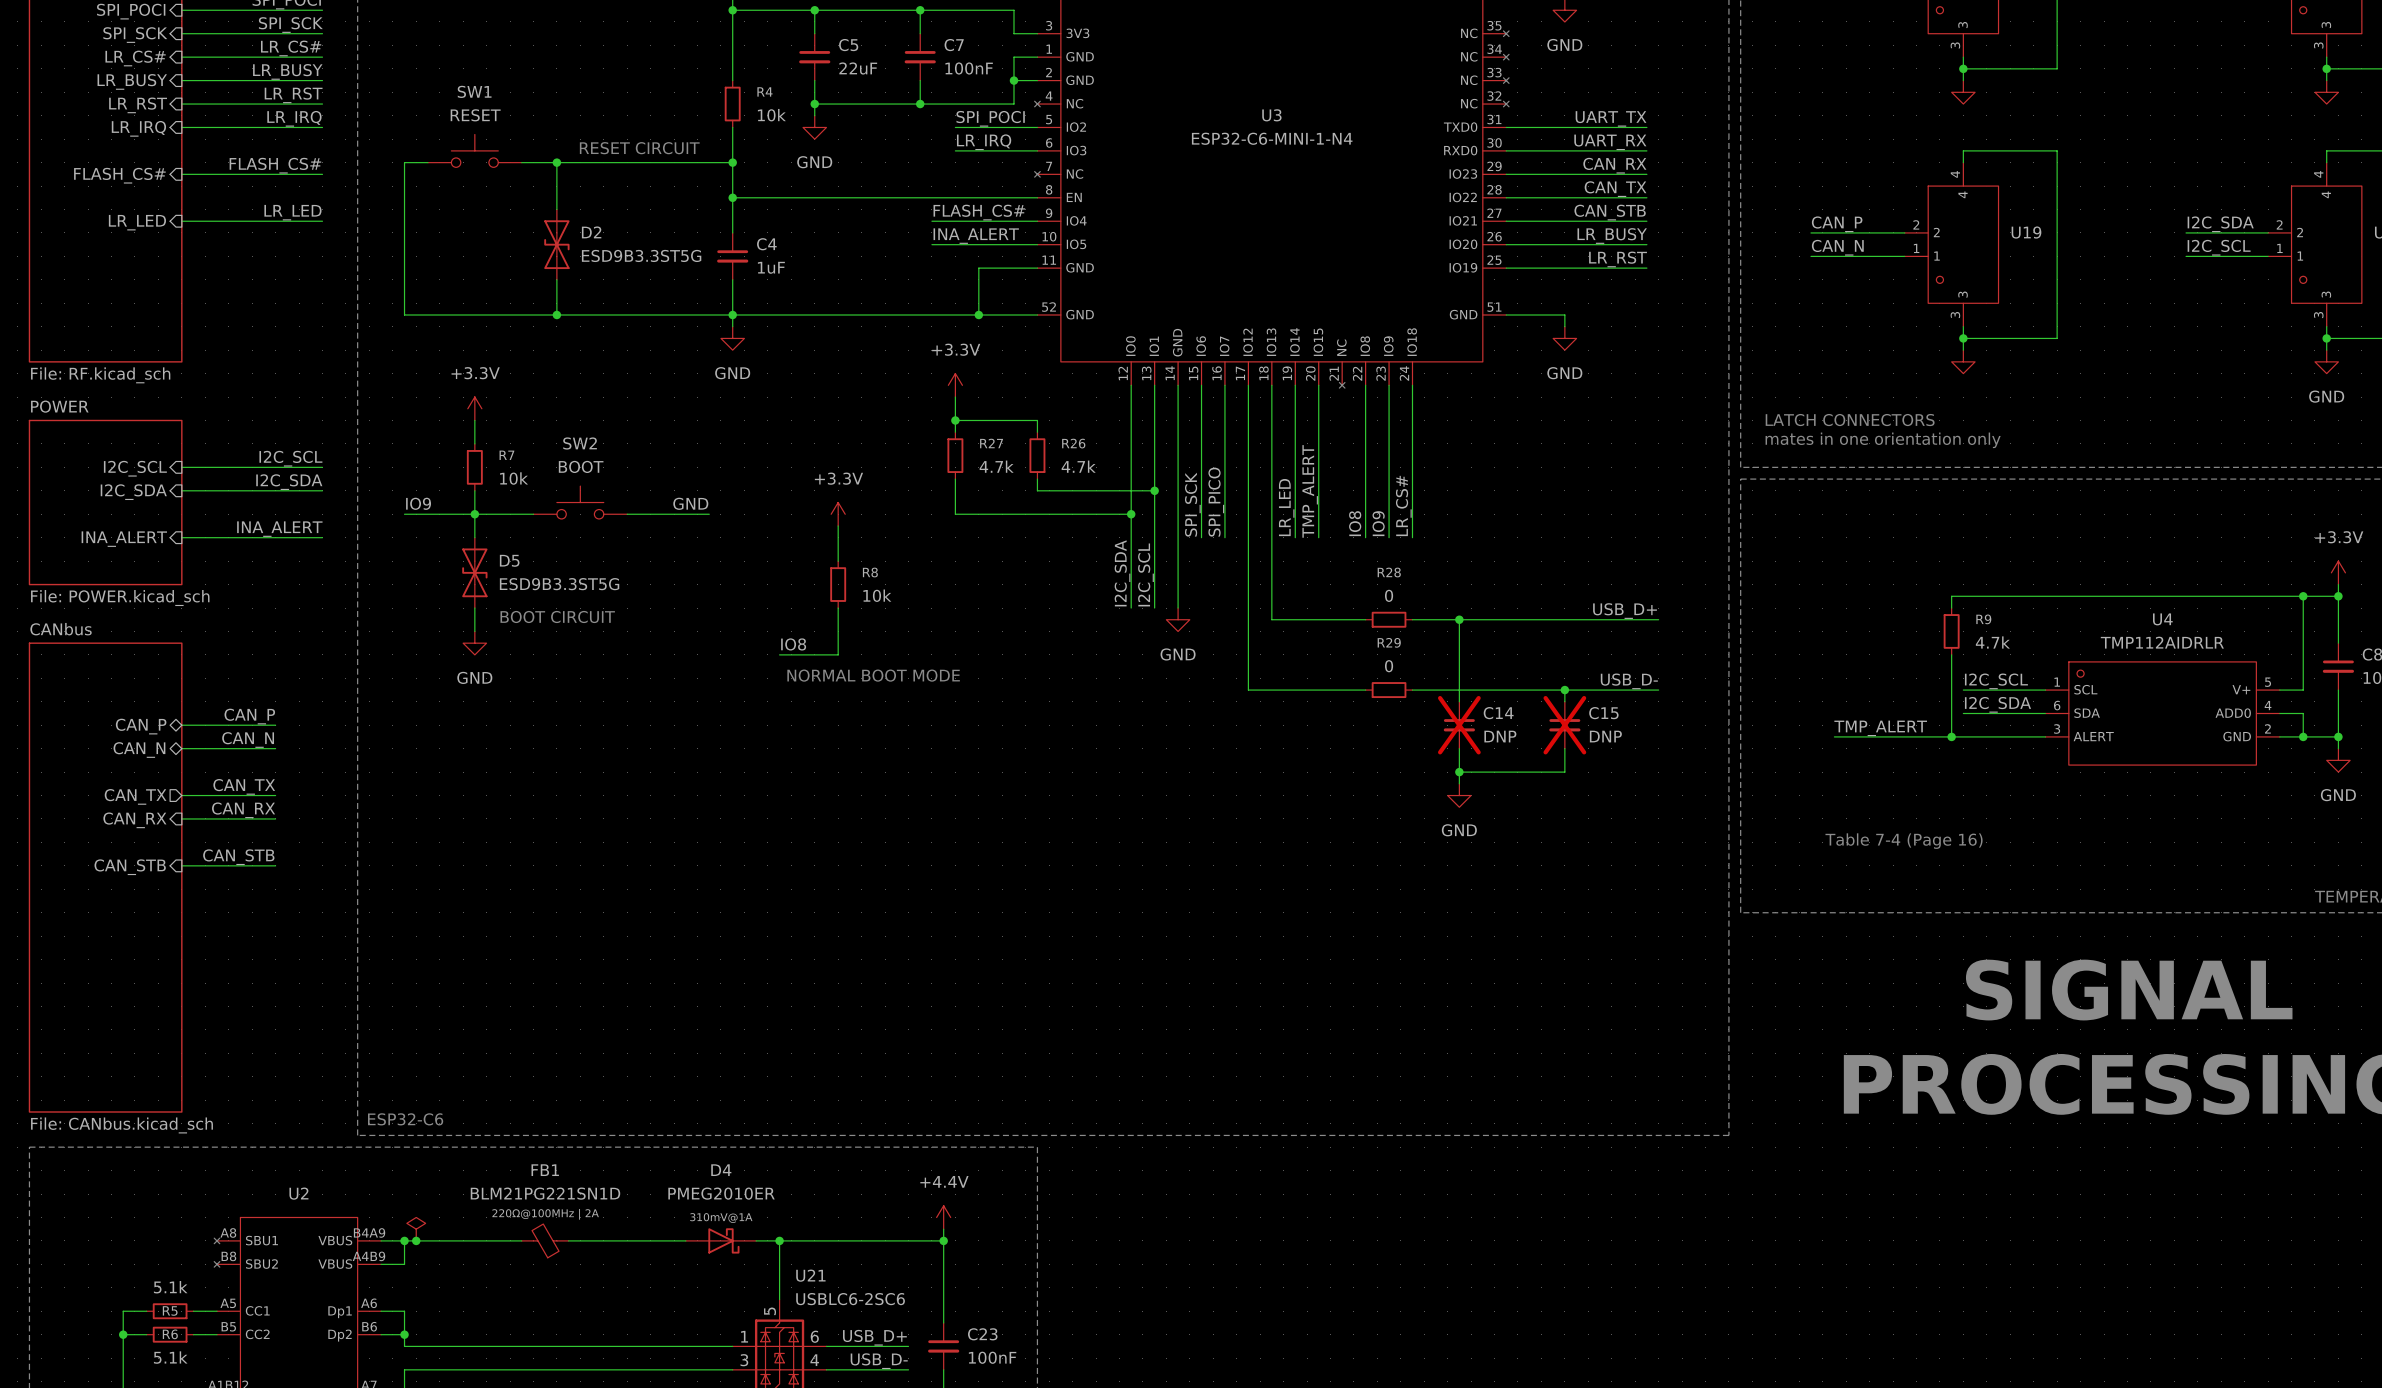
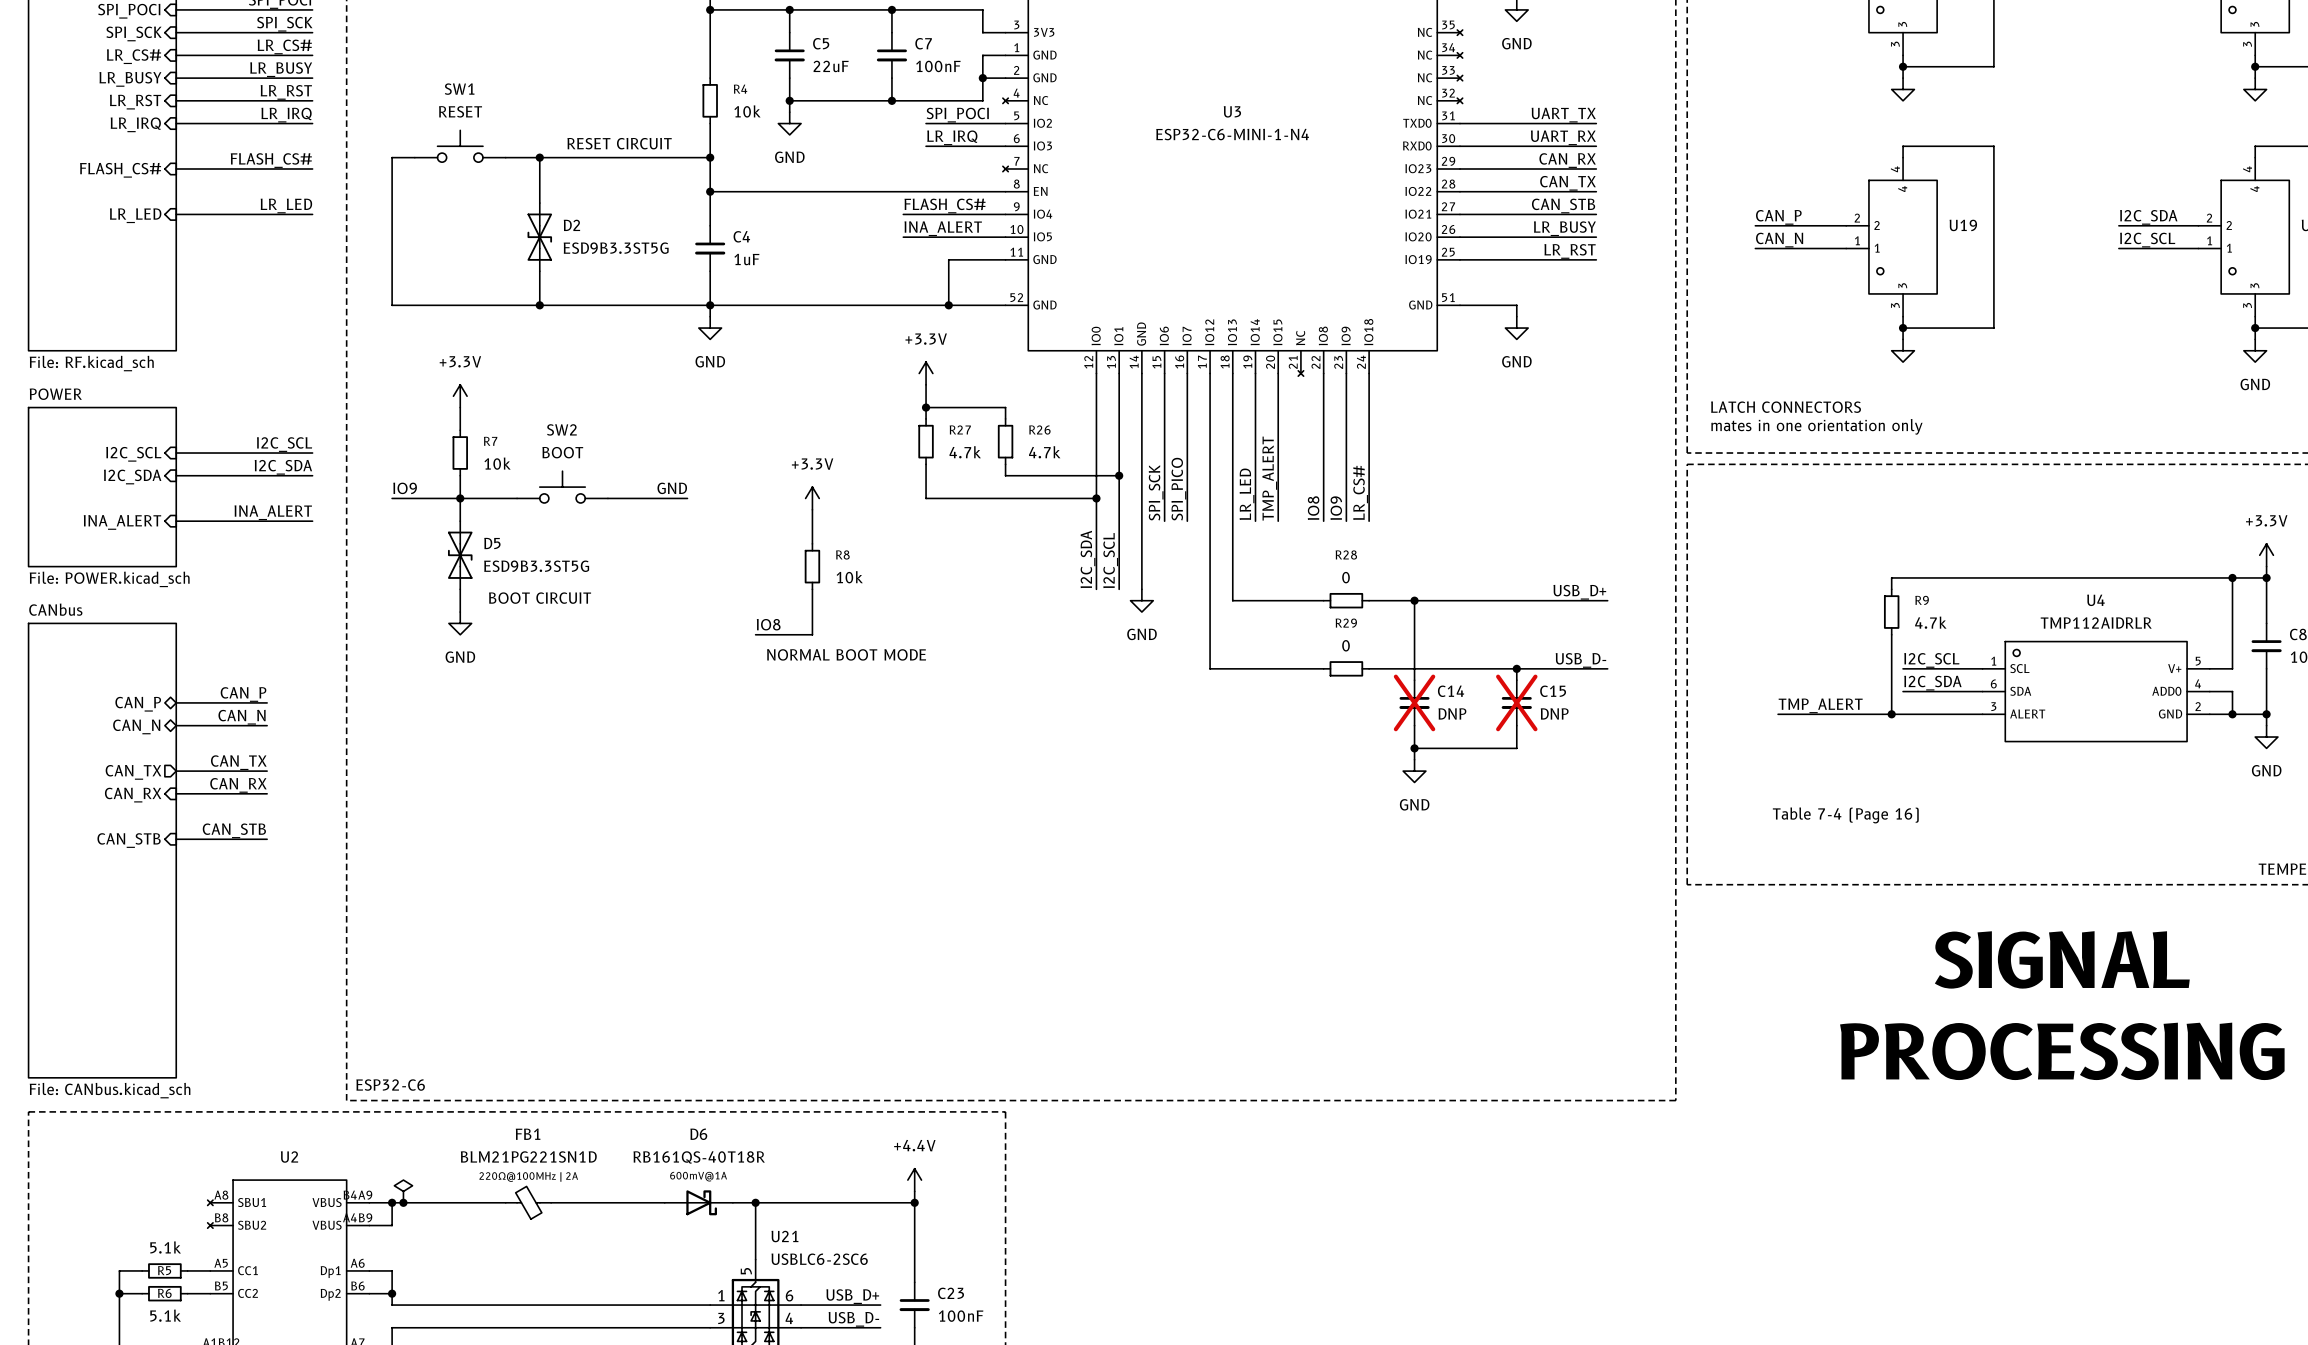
D4: PMEG2010ER (720, 1240) -> none
D6: none -> RB161QS-40T18R (698, 1202)

